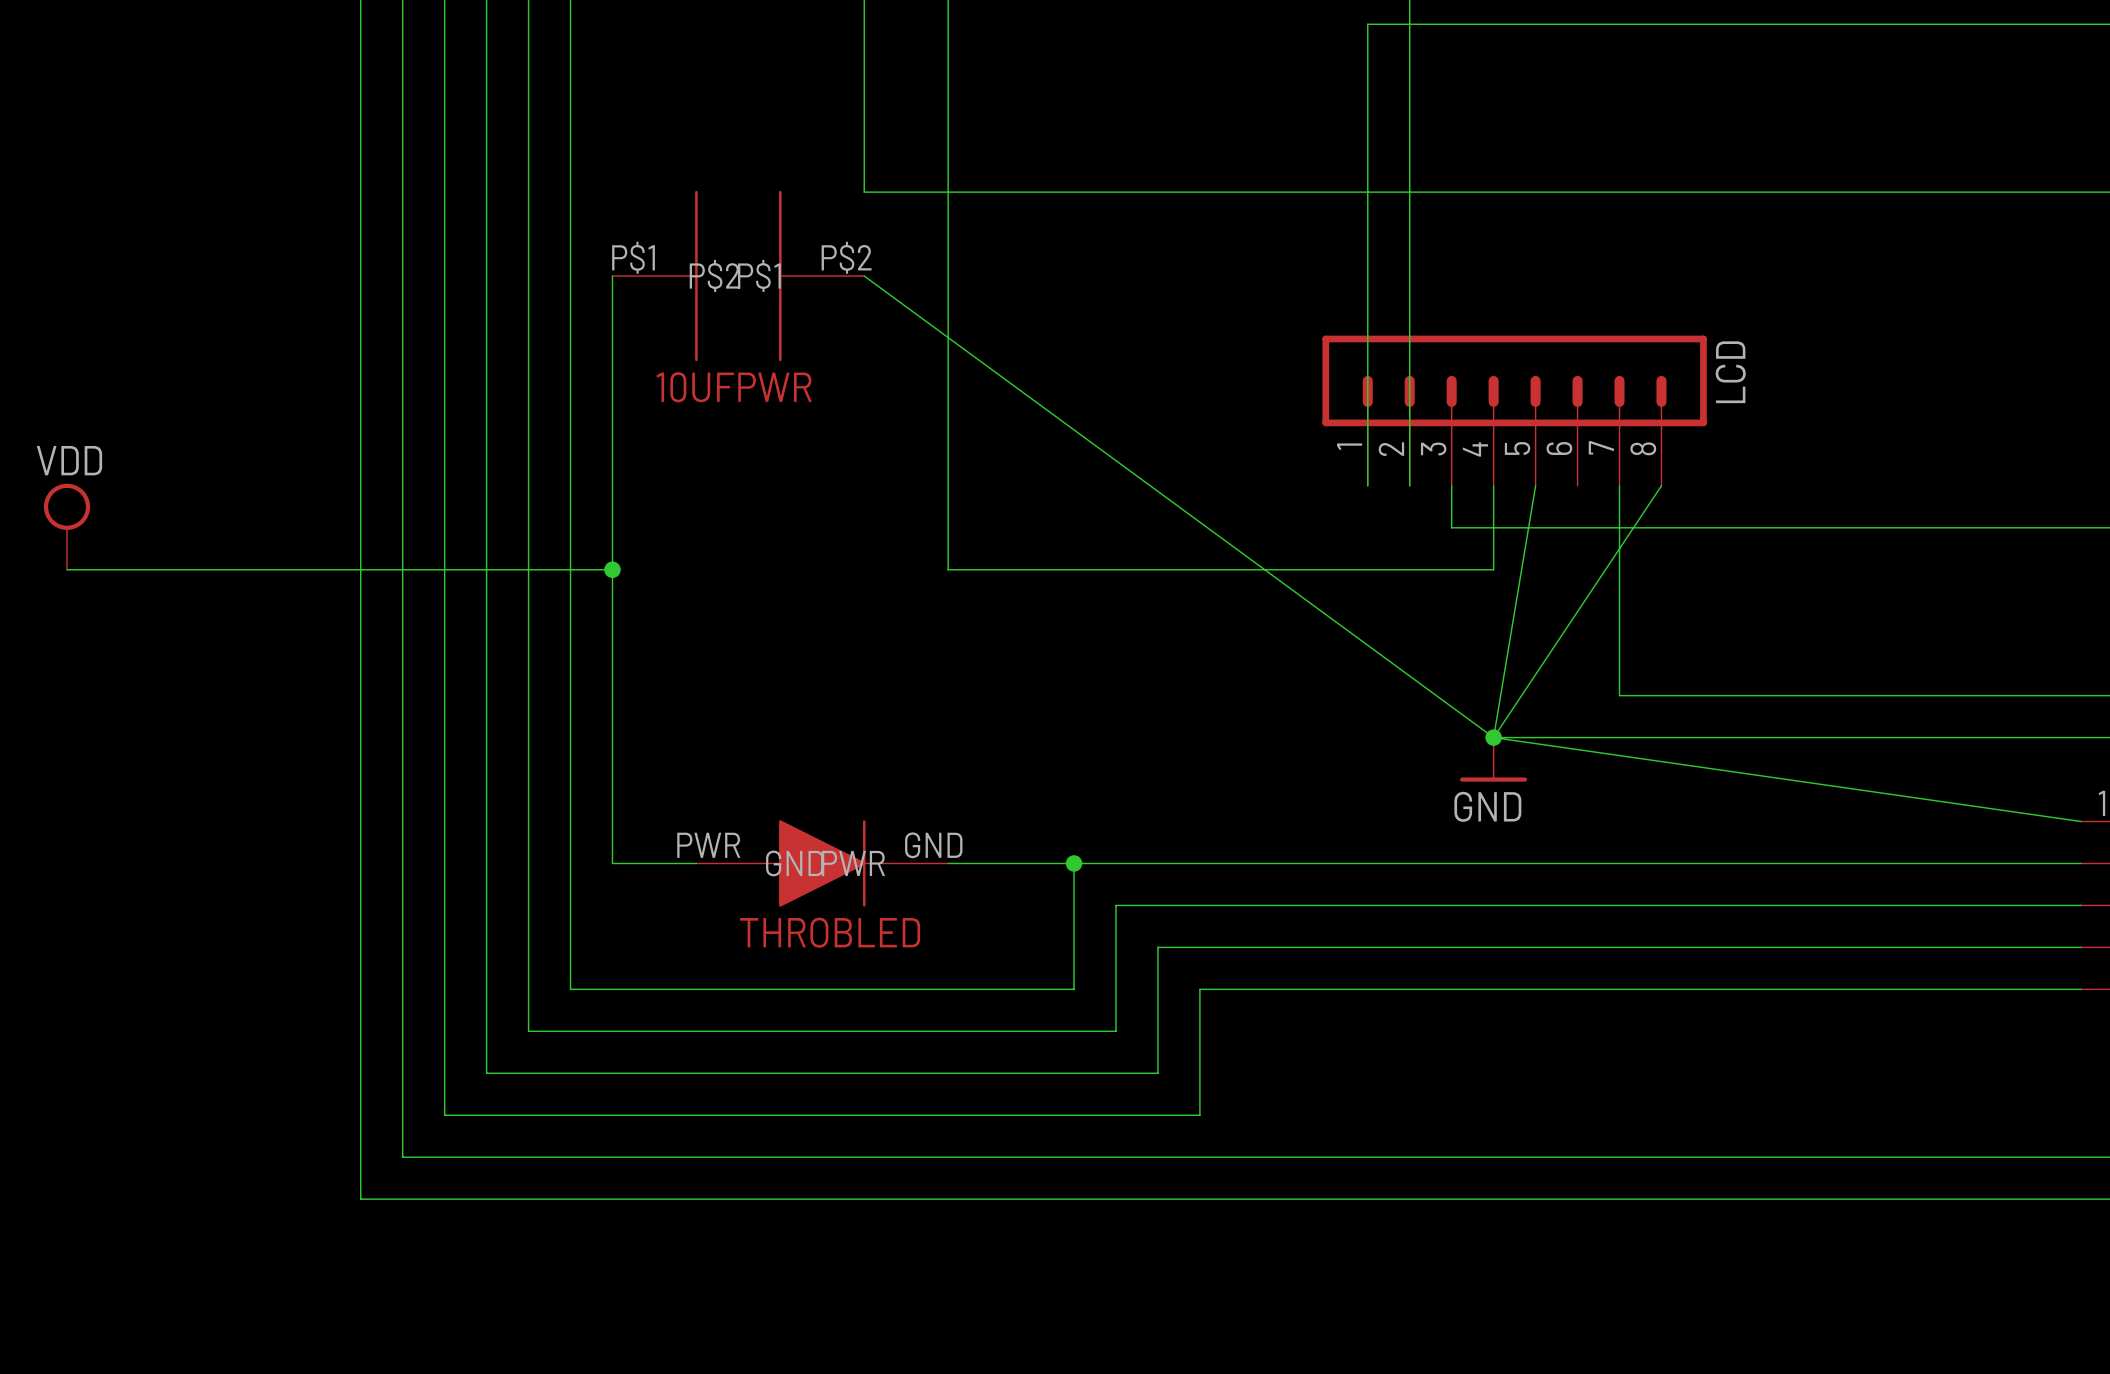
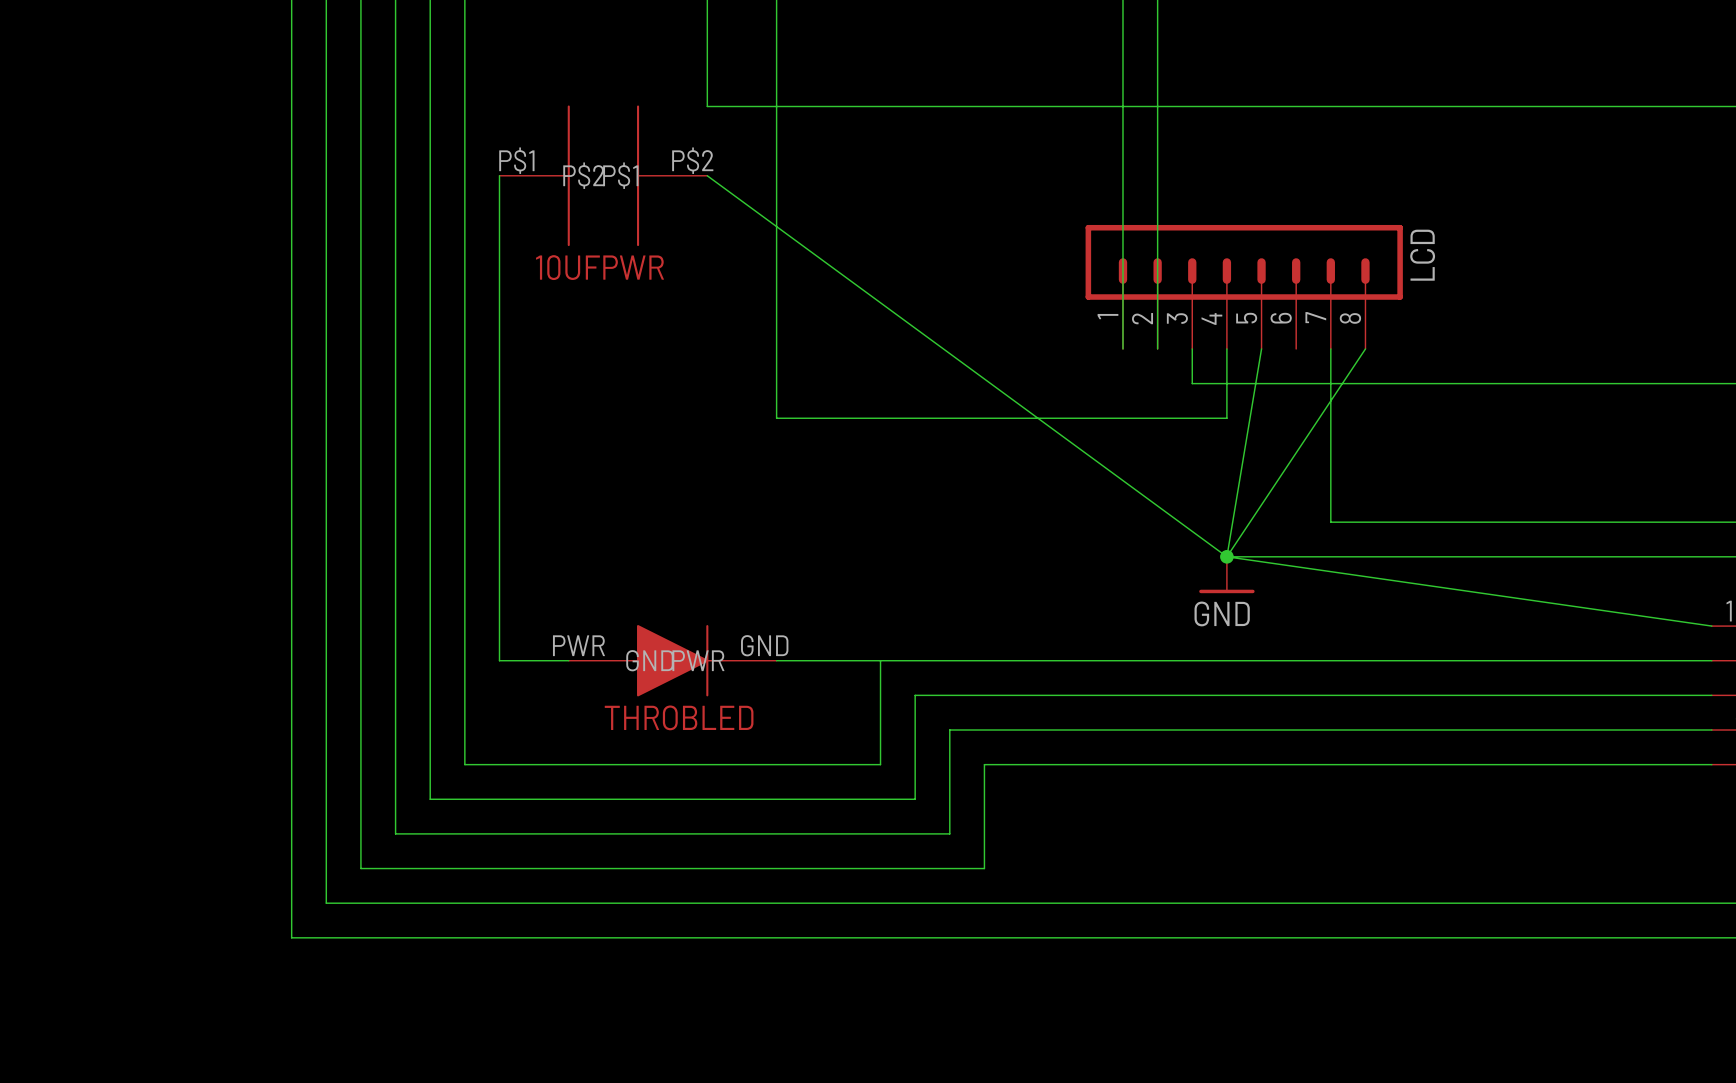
power symbol: VDD (67, 526) -> none
wire: (67, 569) (612, 569) -> none
junction: (612, 569) -> none
junction: (1074, 863) -> none

